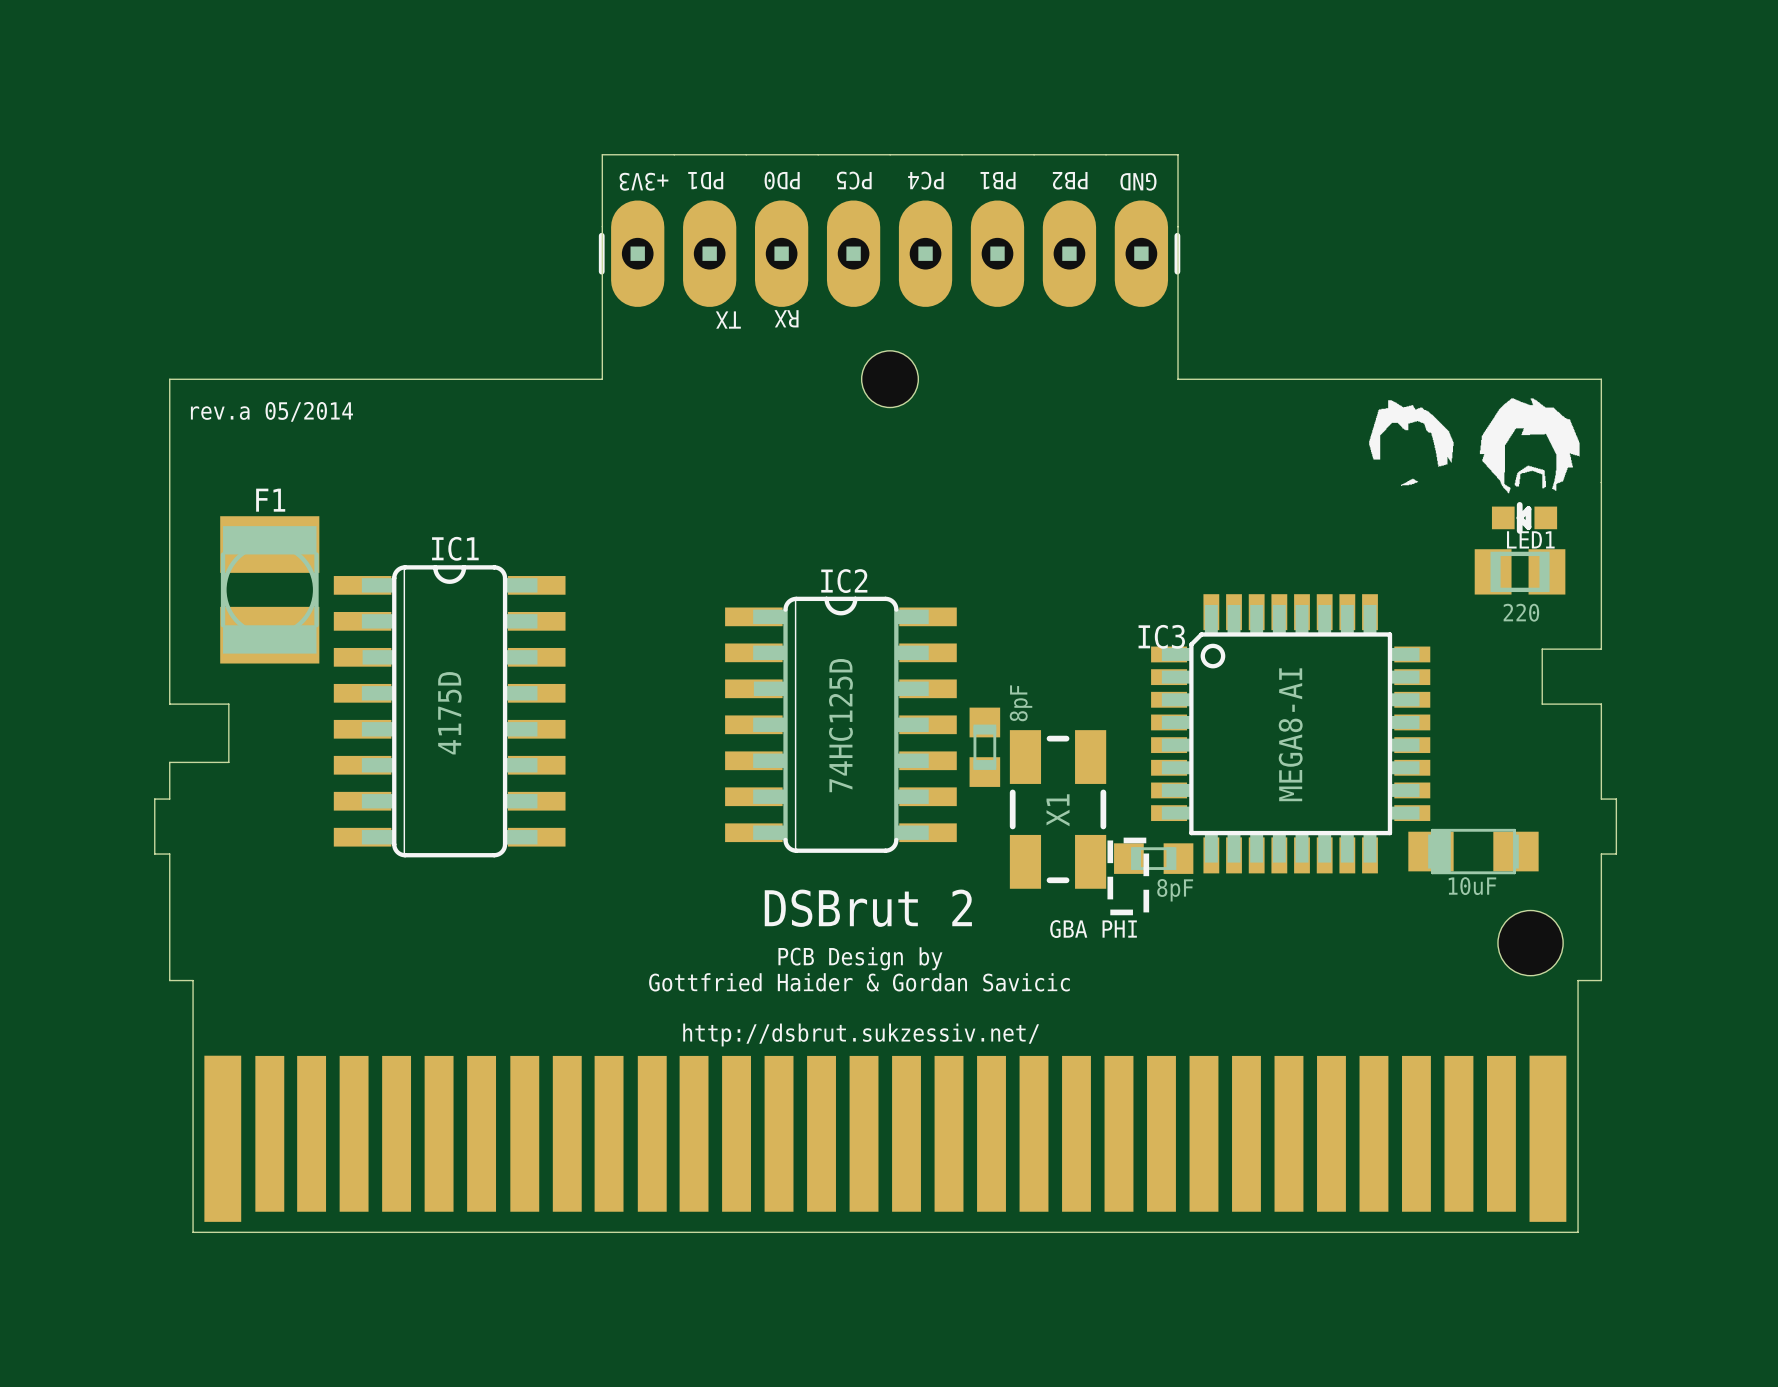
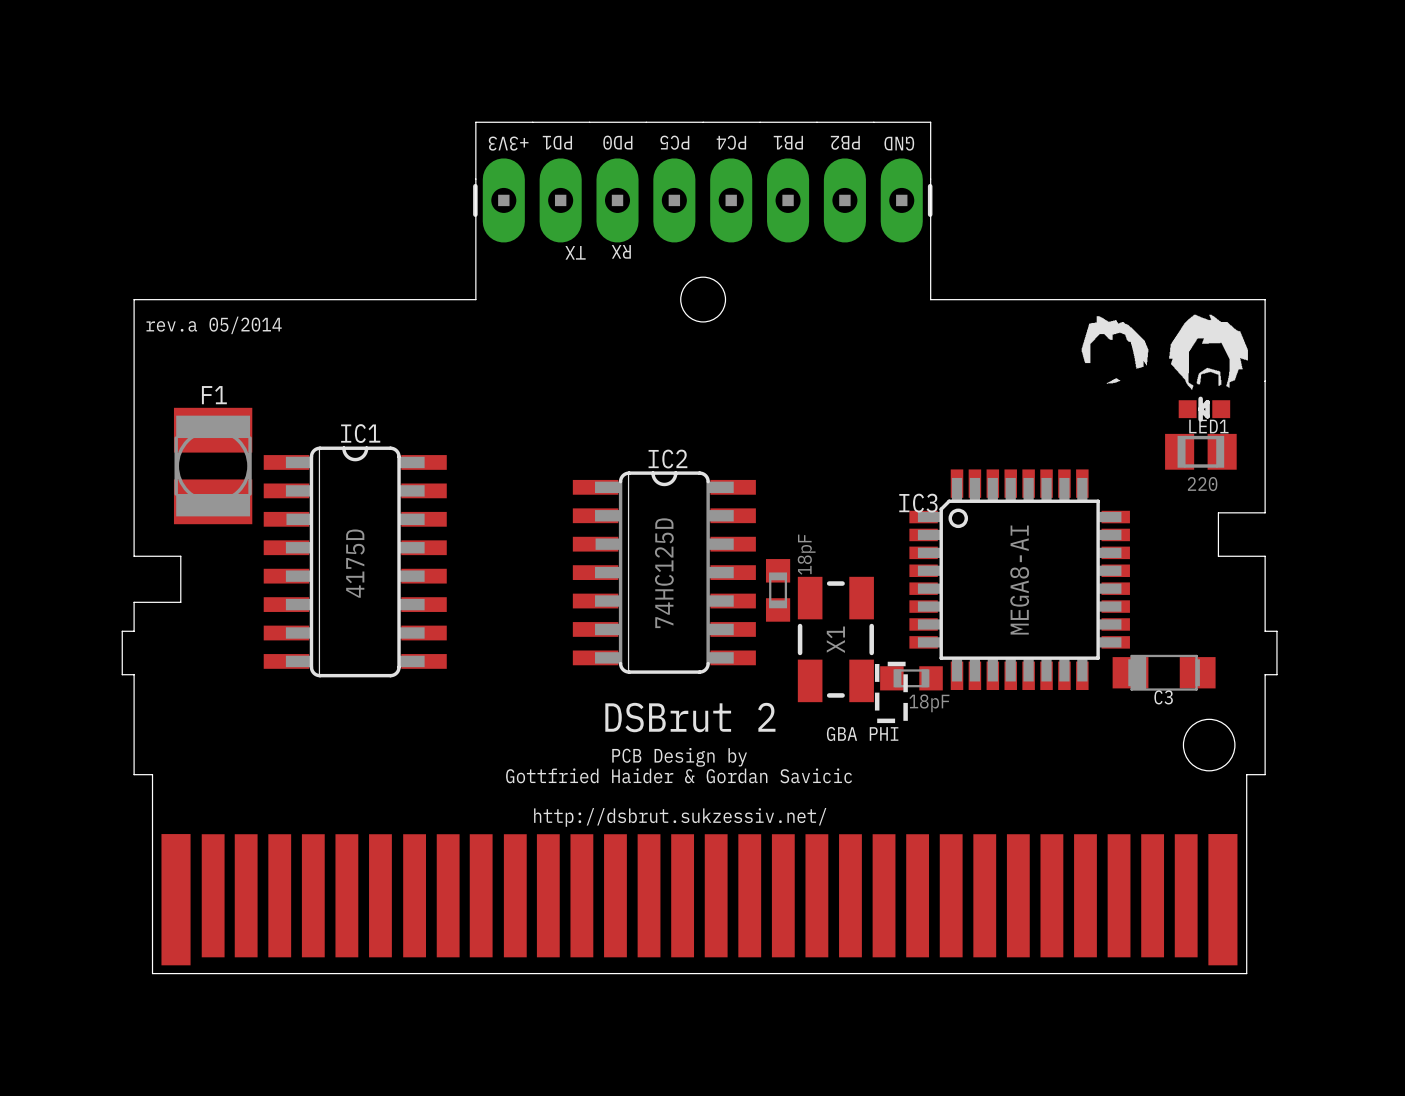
part value: 8pF (1021, 703) -> 18pF (806, 554)
C3 name: none -> C3 (1163, 697)
C3 value: 10uF (1472, 886) -> none
part value: 8pF (1175, 890) -> 18pF (929, 703)

